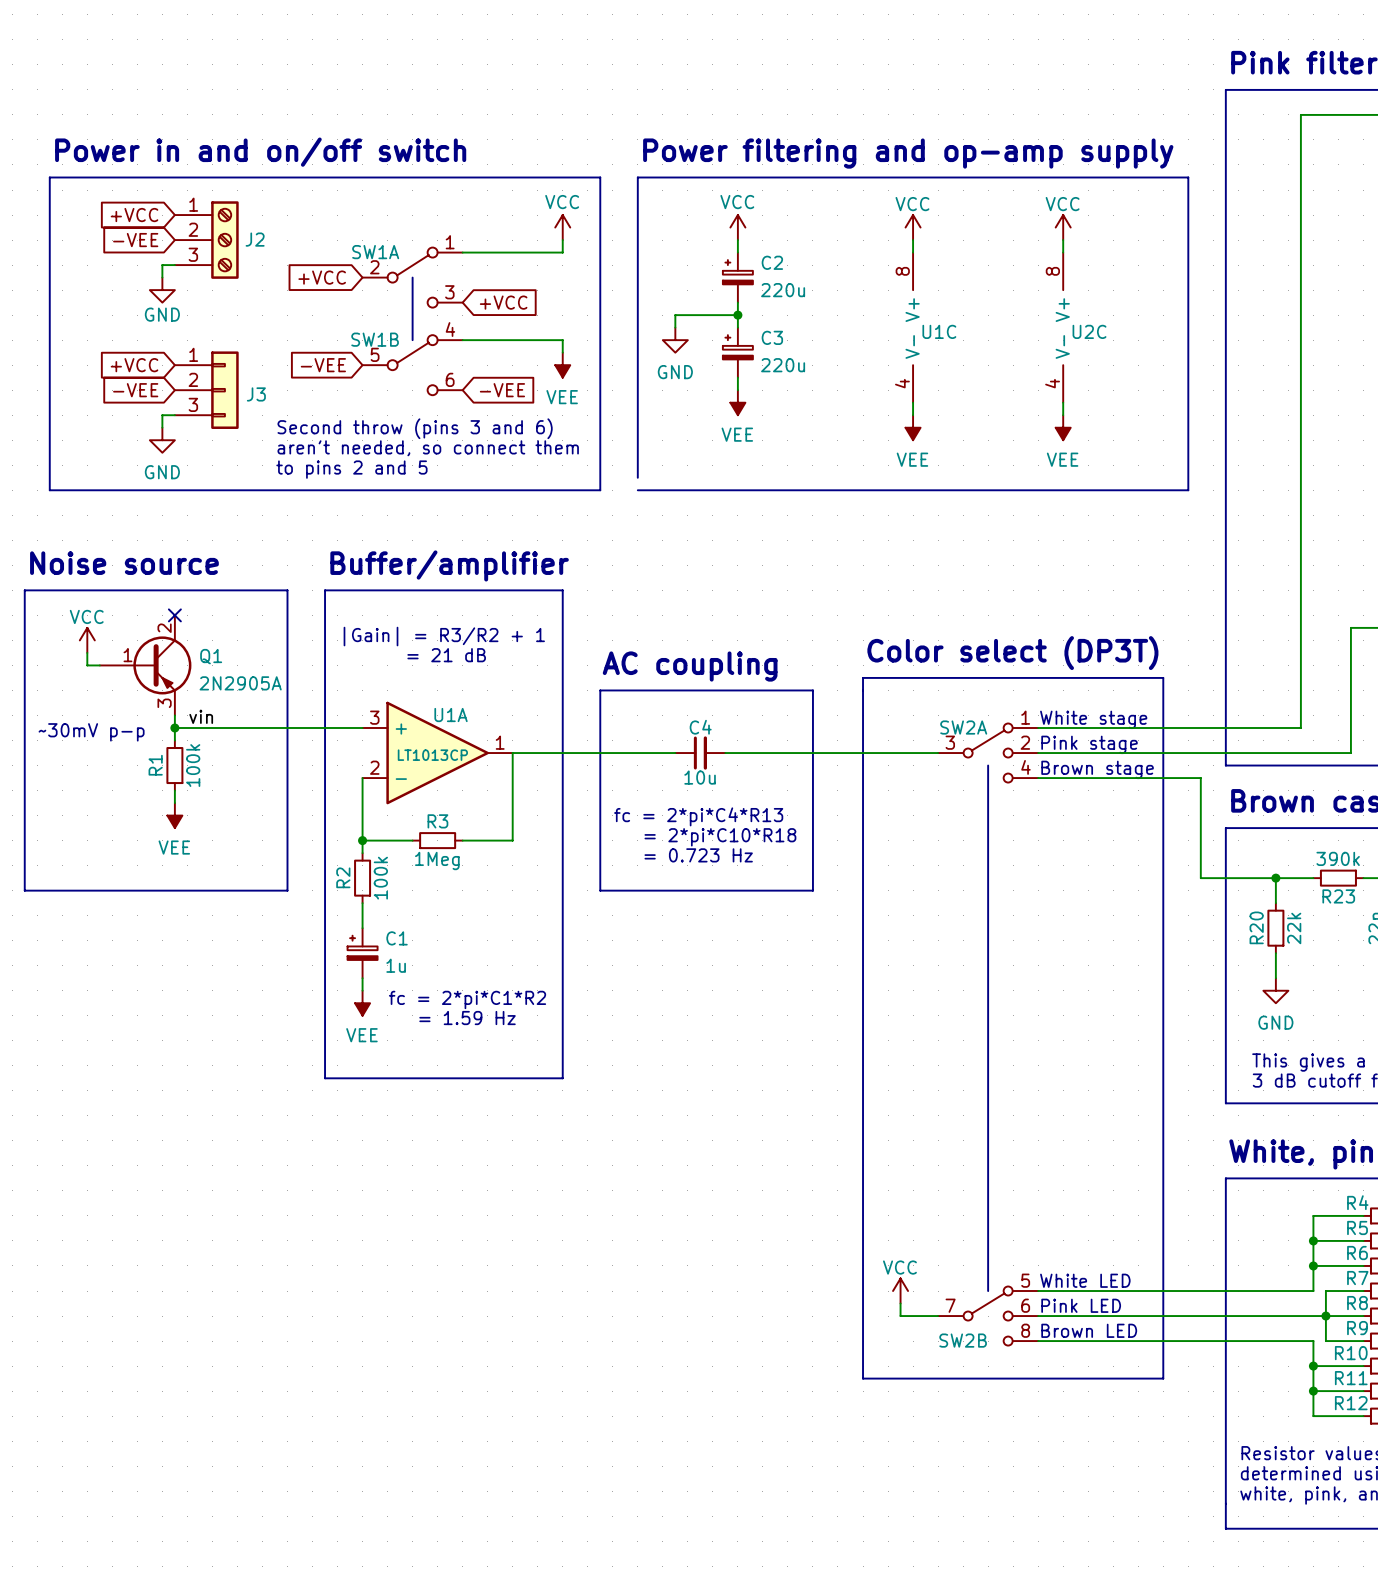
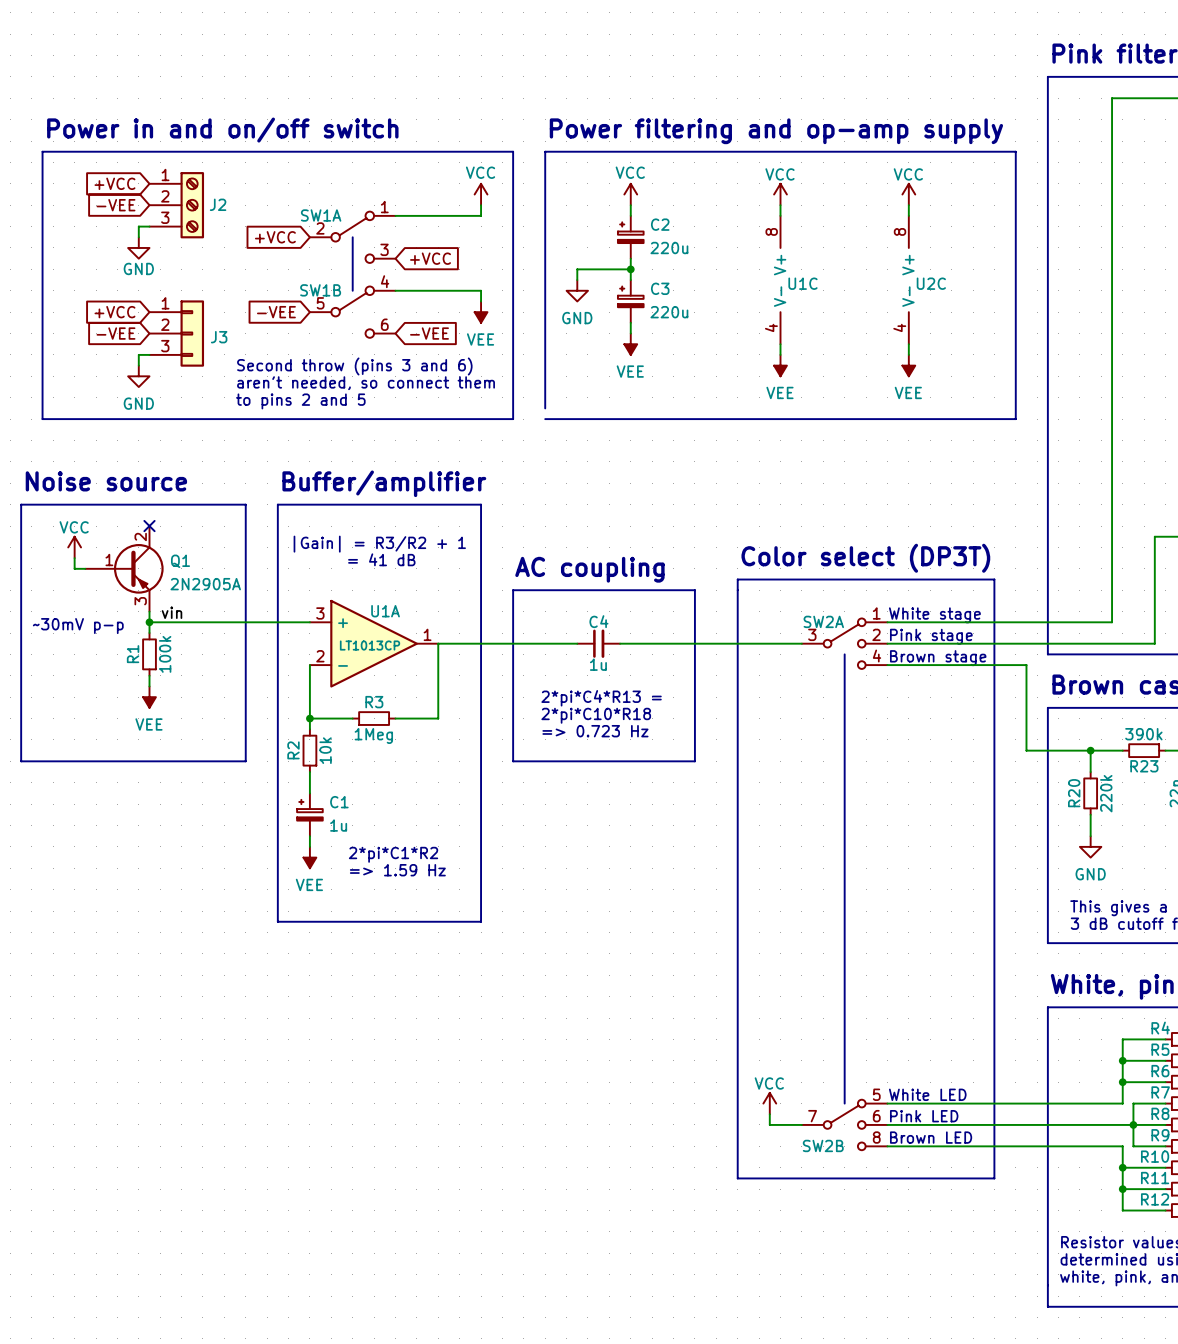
text: = 21 dB (446, 655) -> = 41 dB (381, 559)
C4 value: 10u (700, 777) -> 1u (598, 664)
text: fc = 2*pi*C4*R13 (698, 816) -> none
text: none -> 2*pi*C4*R13 = (601, 698)
text: none -> 2*pi*C10*R18 (596, 715)
text: = 2*pi*C10*R18 (720, 837) -> none
text: = 0.723 Hz (698, 855) -> => 0.723 Hz (595, 731)
R2 value: 100k (380, 878) -> 10k (325, 750)
R20 value: 22k (1294, 928) -> 220k (1106, 793)
text: fc = 2*pi*C1*R2 (467, 999) -> 2*pi*C1*R2 (393, 854)
text: = 1.59 Hz (467, 1018) -> => 1.59 Hz (397, 870)

